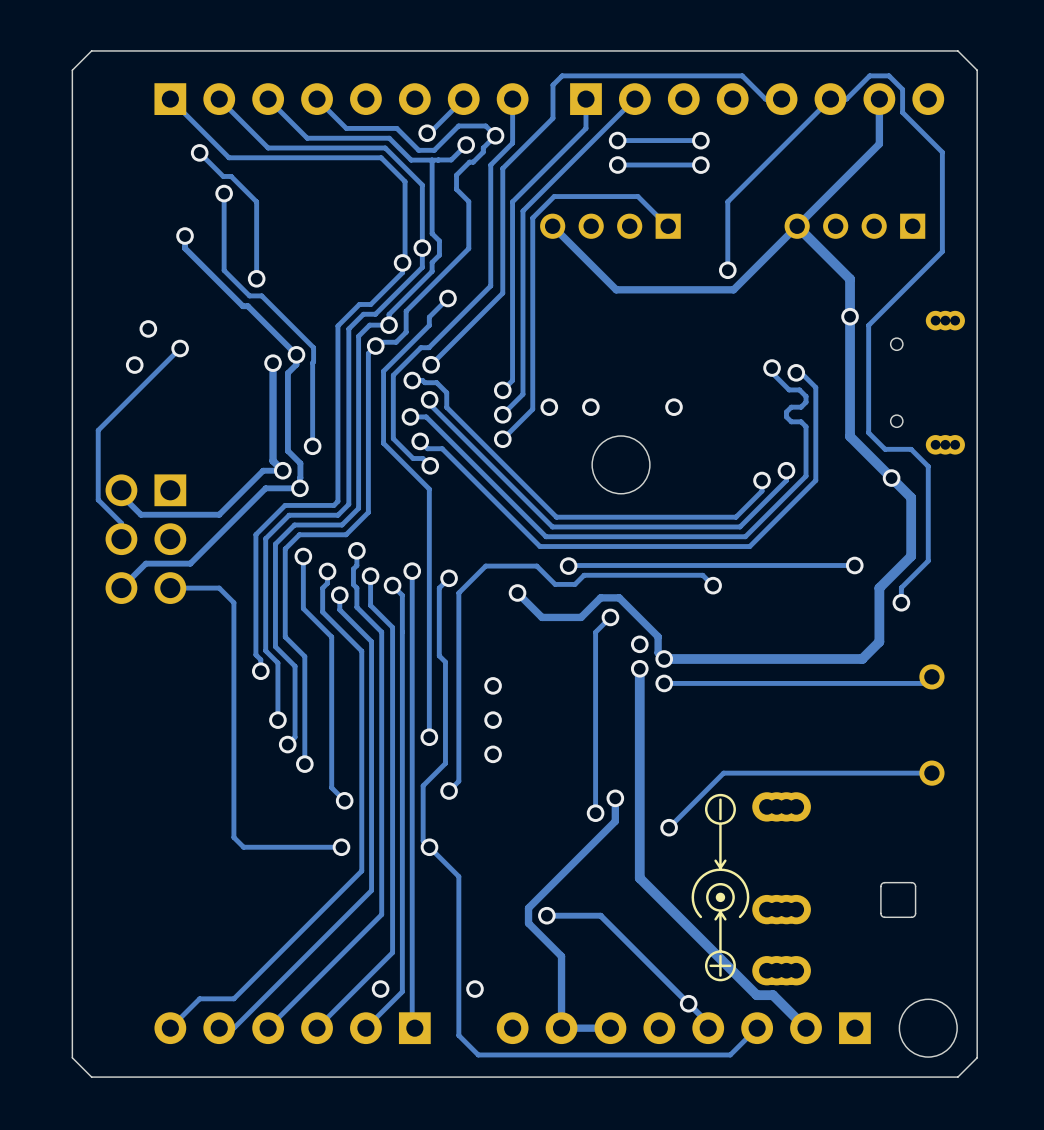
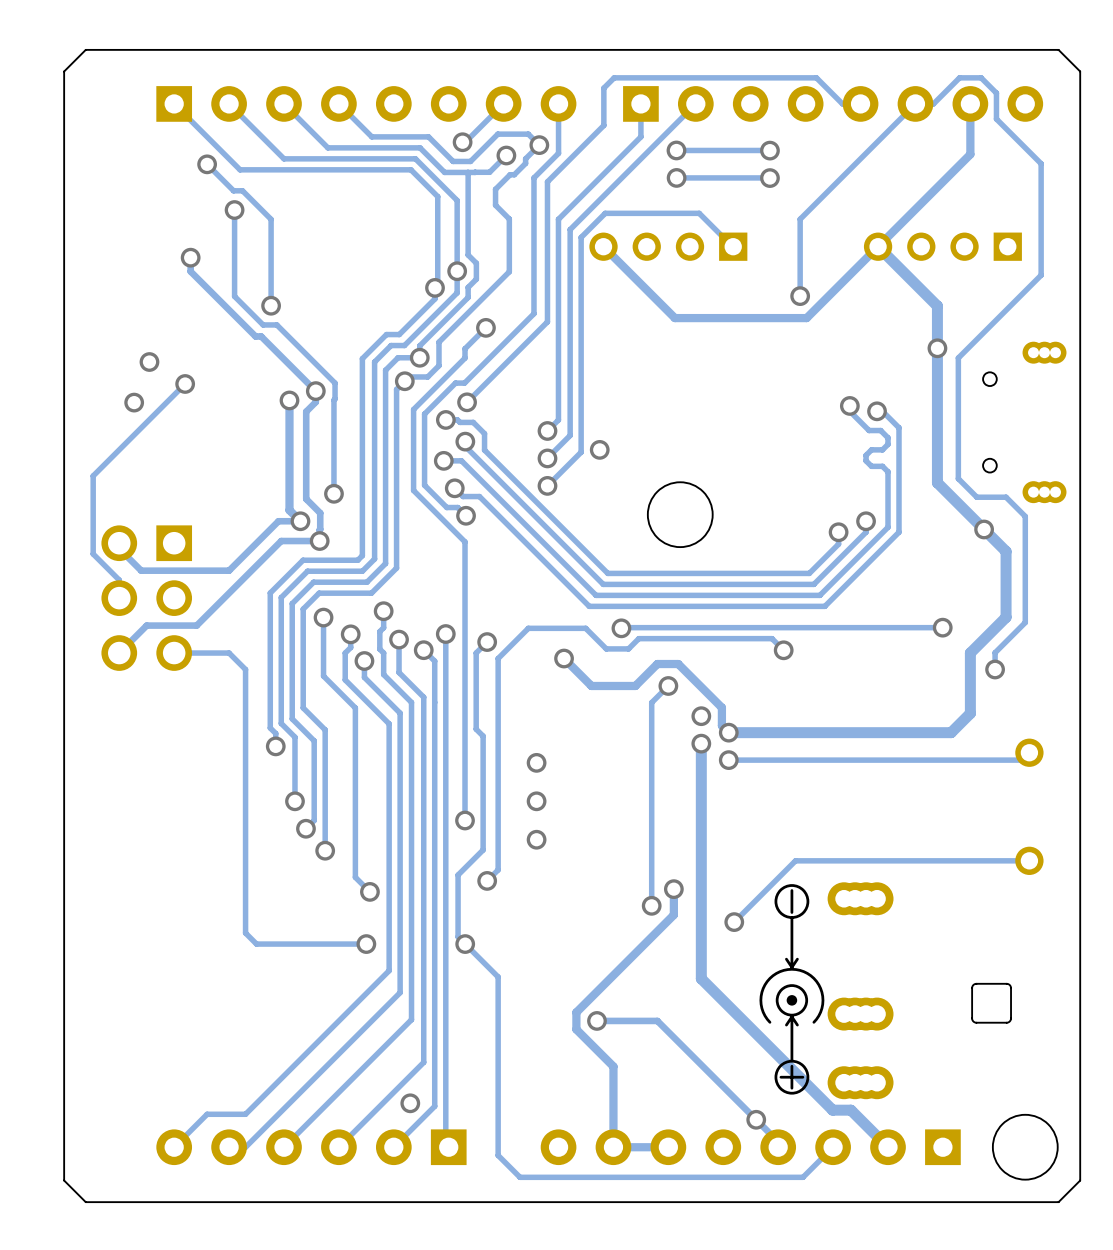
via: (590, 407) -> none
via: (674, 407) -> none
via: (474, 989) -> none

